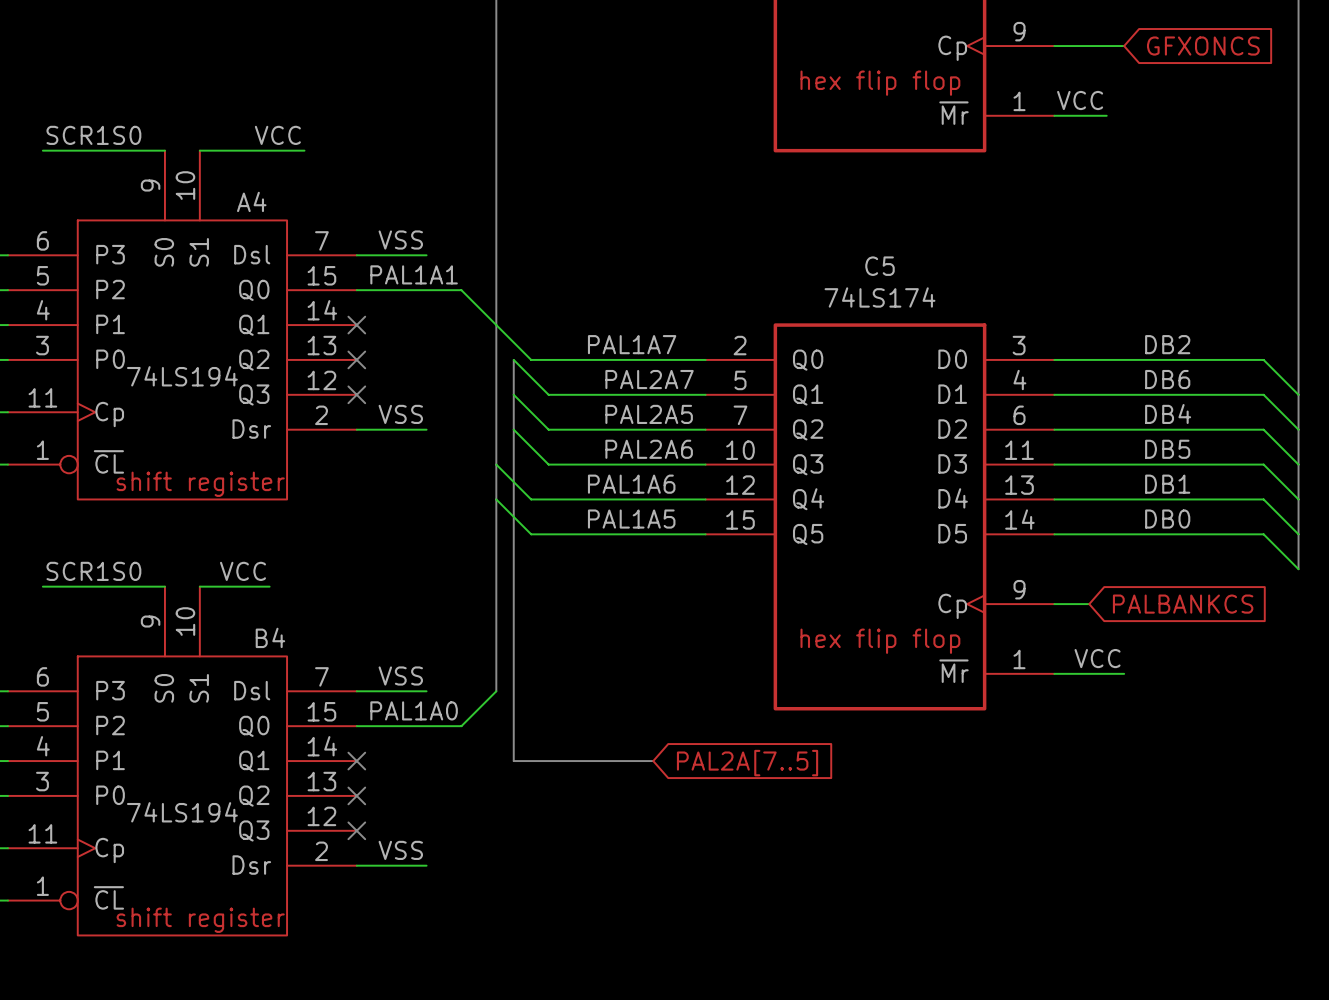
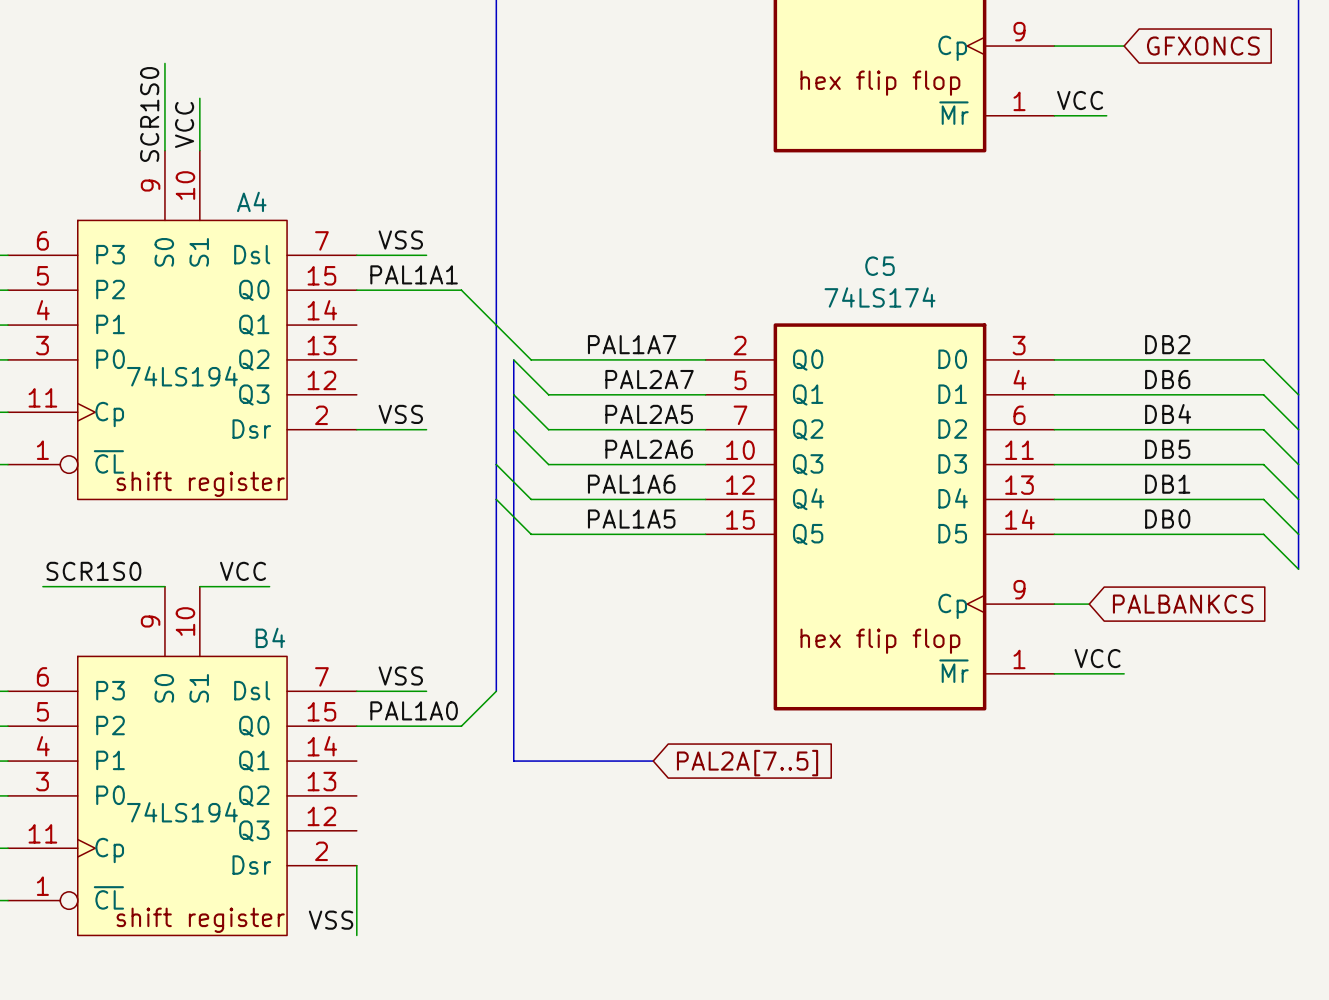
label rotation: 0° (93, 135) -> 90° counterclockwise (149, 114)
label rotation: 0° (277, 135) -> 90° counterclockwise (184, 124)
label position: VCC (277, 135) -> VCC (184, 124)
wire: (42, 150) (164, 150) -> (164, 63) (164, 150)
wire: (199, 150) (304, 150) -> (199, 150) (199, 98)
no-connect mark: (356, 325) -> none
no-connect mark: (356, 359) -> none
no-connect mark: (356, 394) -> none
no-connect mark: (356, 761) -> none
no-connect mark: (356, 795) -> none
no-connect mark: (356, 830) -> none
label position: VSS (400, 850) -> VSS (331, 920)
wire: (356, 865) (426, 865) -> (356, 865) (356, 935)

